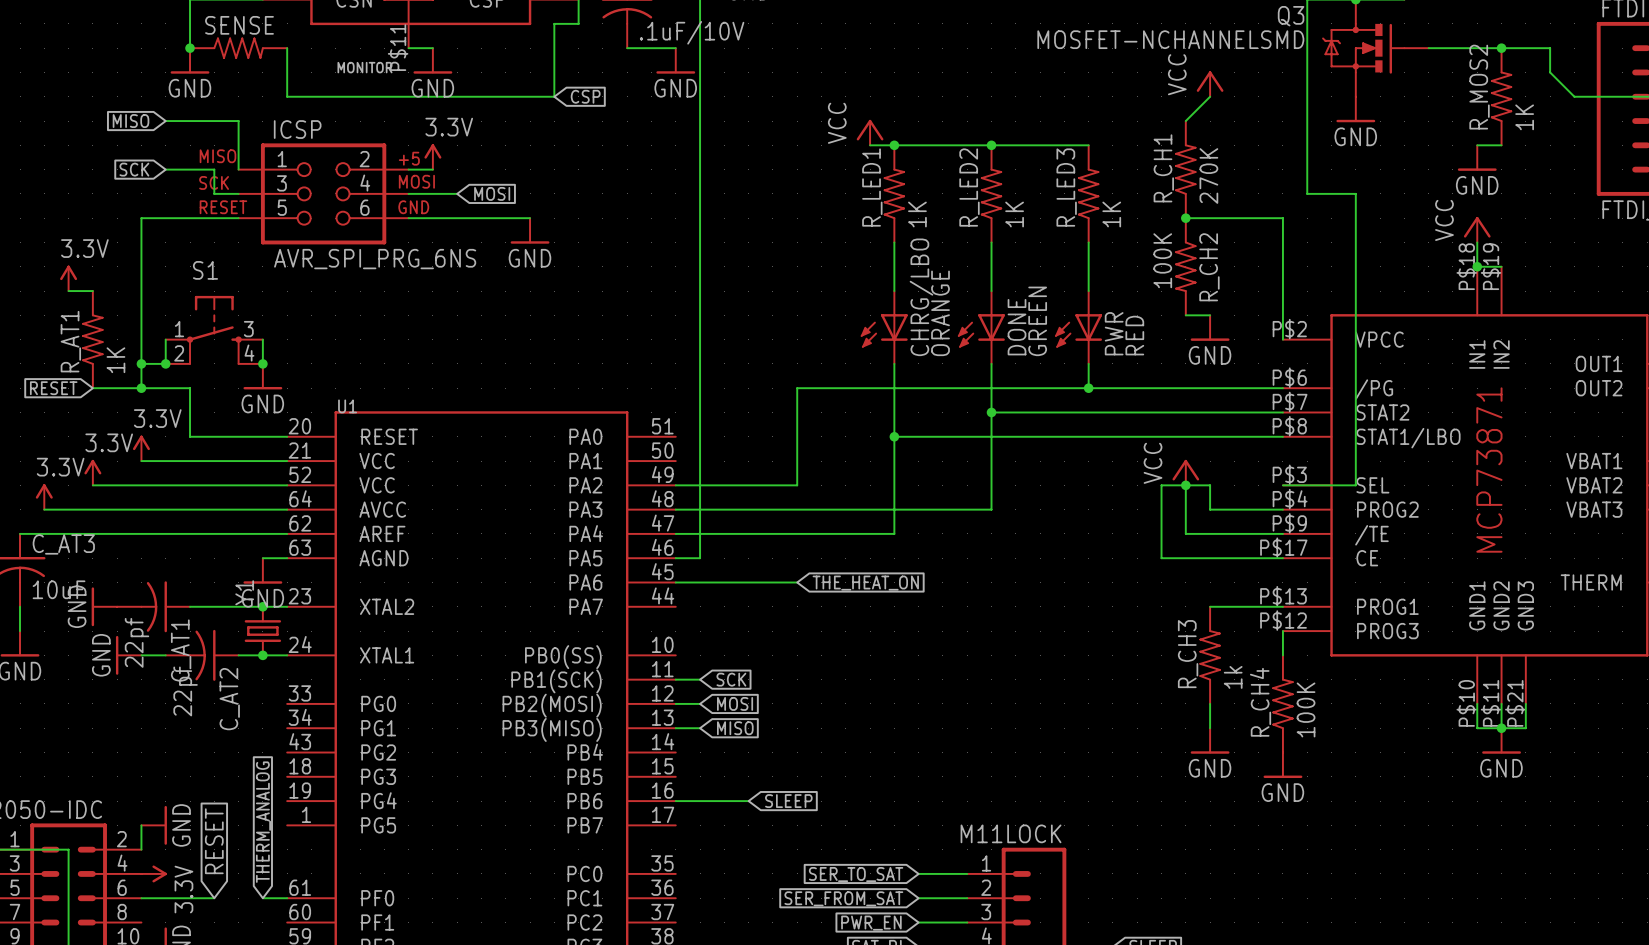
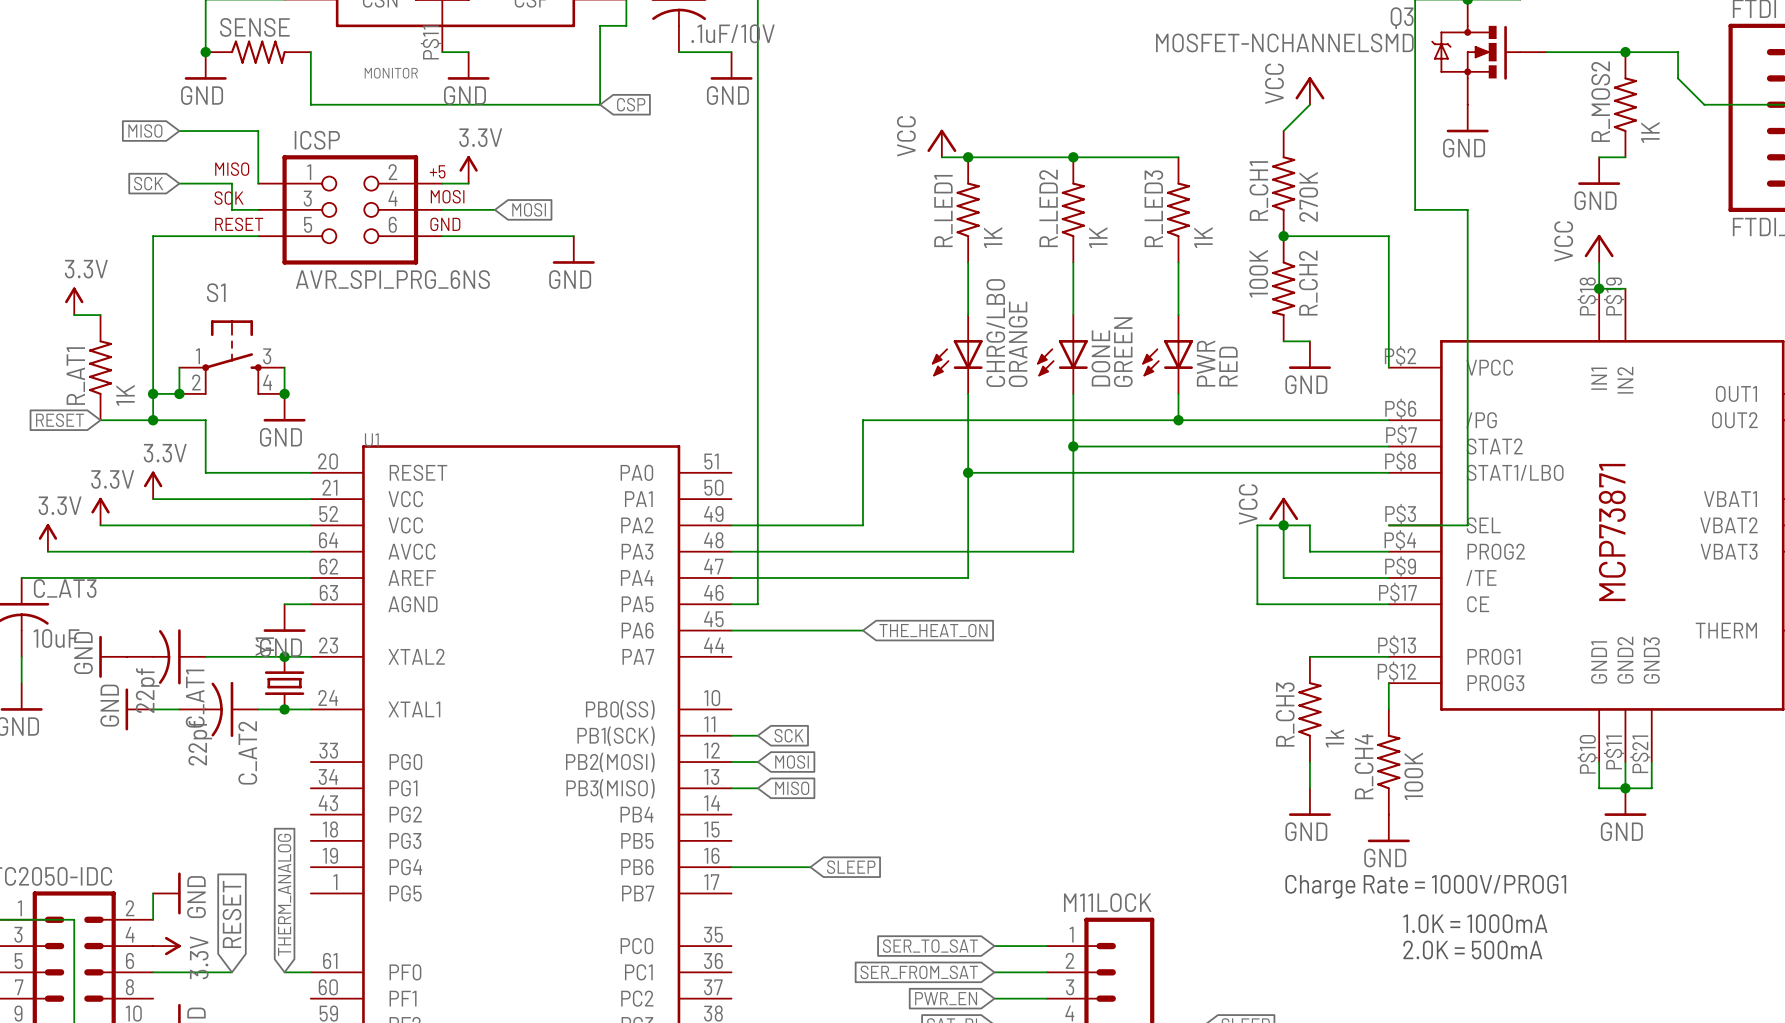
text: none -> Charge Rate = 1000V/PROG1 (1425, 886)
text: none -> 1.0K = 1000mA (1475, 923)
text: none -> 2.0K = 500mA (1472, 950)

